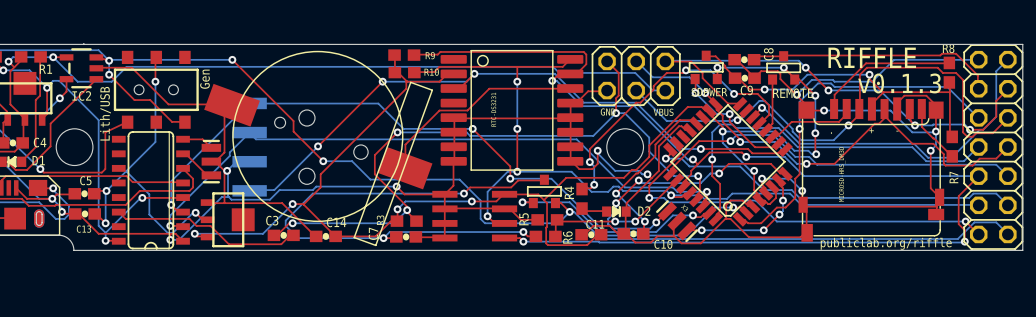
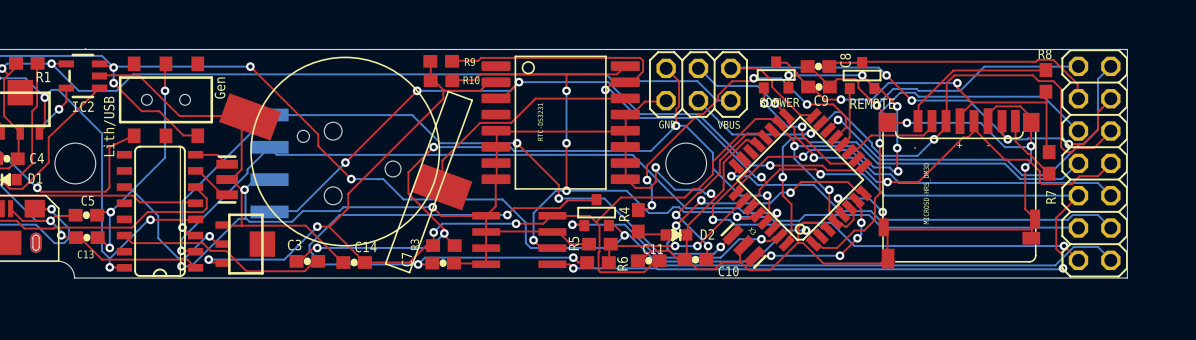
text: RIFFLE (872, 57) -> none
text: v0.1.3 (899, 83) -> none
text: publiclab.org/riffle (886, 243) -> none

